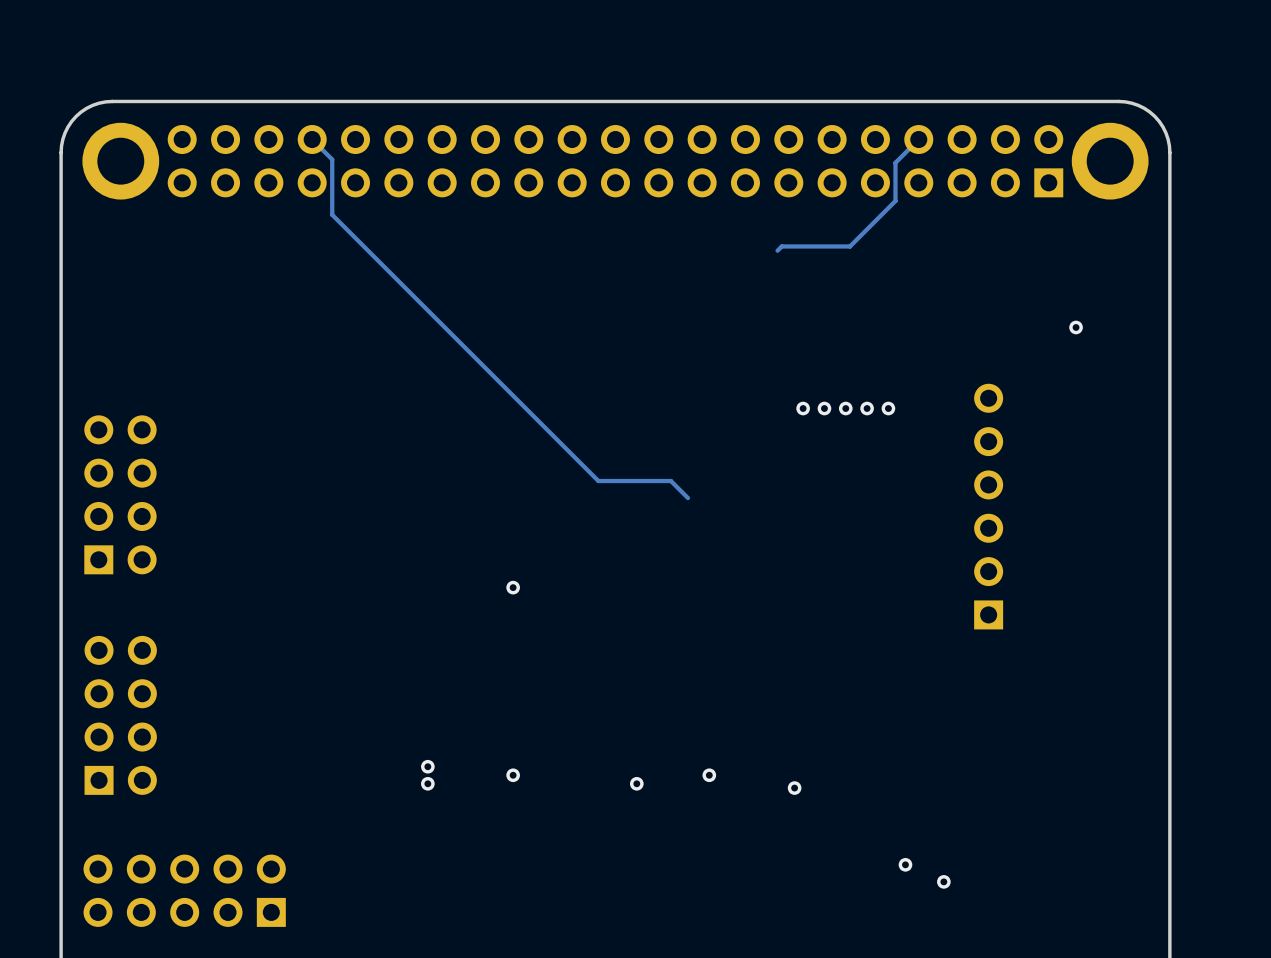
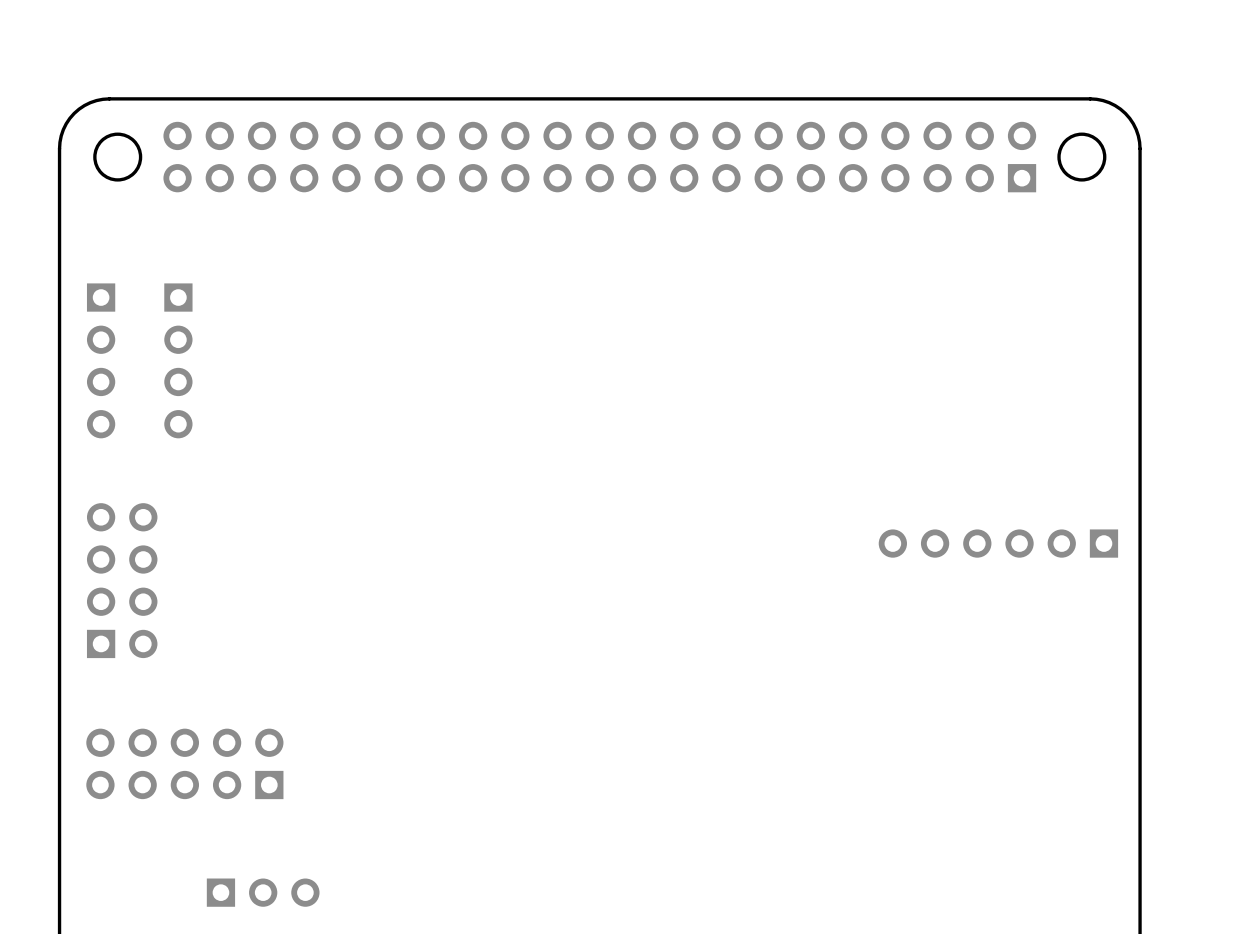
round board edge: none -> [93, 132, 143, 182]
round board edge: none -> [1057, 132, 1107, 182]
track: (312, 139) (332, 159) (332, 214) (598, 481) (670, 481) (687, 498) -> none
track: (918, 139) (895, 162) (895, 201) (850, 246) (781, 246) (777, 250) -> none
part: (120, 161) -> none
part: (1110, 161) -> none
via: (1076, 327) -> none
part: none -> (101, 360)
part: none -> (178, 360)
via: (803, 408) -> none
via: (824, 408) -> none
via: (845, 408) -> none
via: (867, 408) -> none
via: (888, 408) -> none
part: (120, 494) -> none
part rotation: 0° (988, 506) -> 90° counterclockwise (998, 543)
via: (513, 587) -> none
part: none -> (122, 580)
part: (120, 715) -> none
via: (427, 766) -> none
via: (513, 775) -> none
via: (709, 775) -> none
via: (427, 783) -> none
via: (636, 783) -> none
via: (794, 788) -> none
via: (905, 864) -> none
via: (943, 881) -> none
part position: (184, 890) -> (184, 763)
part: none -> (263, 892)

